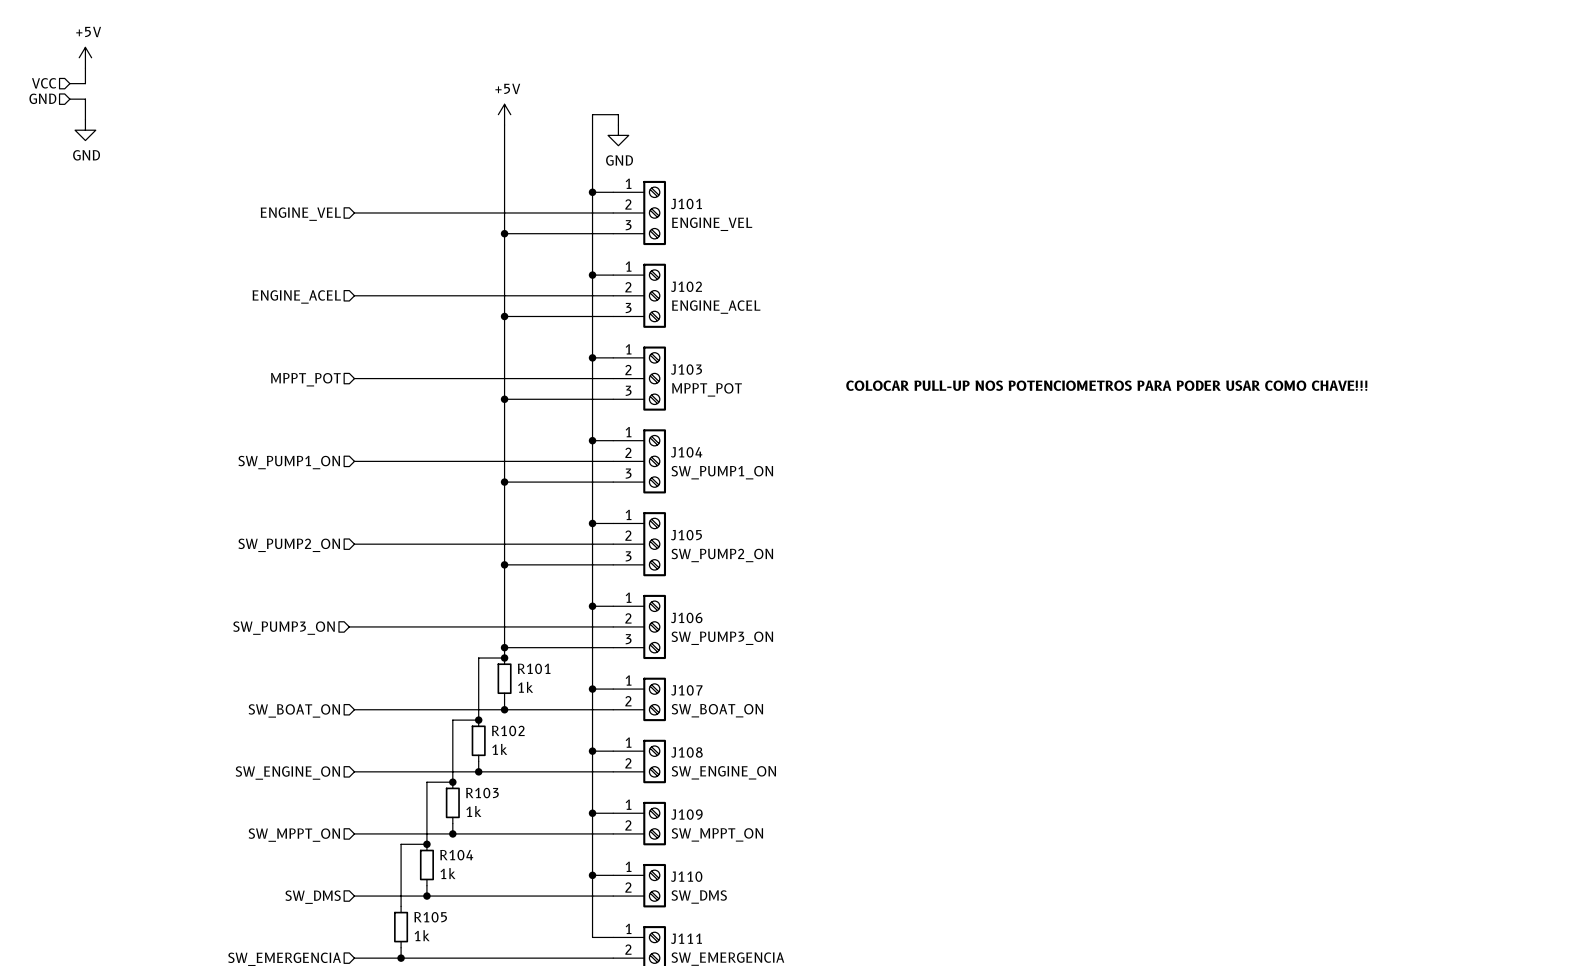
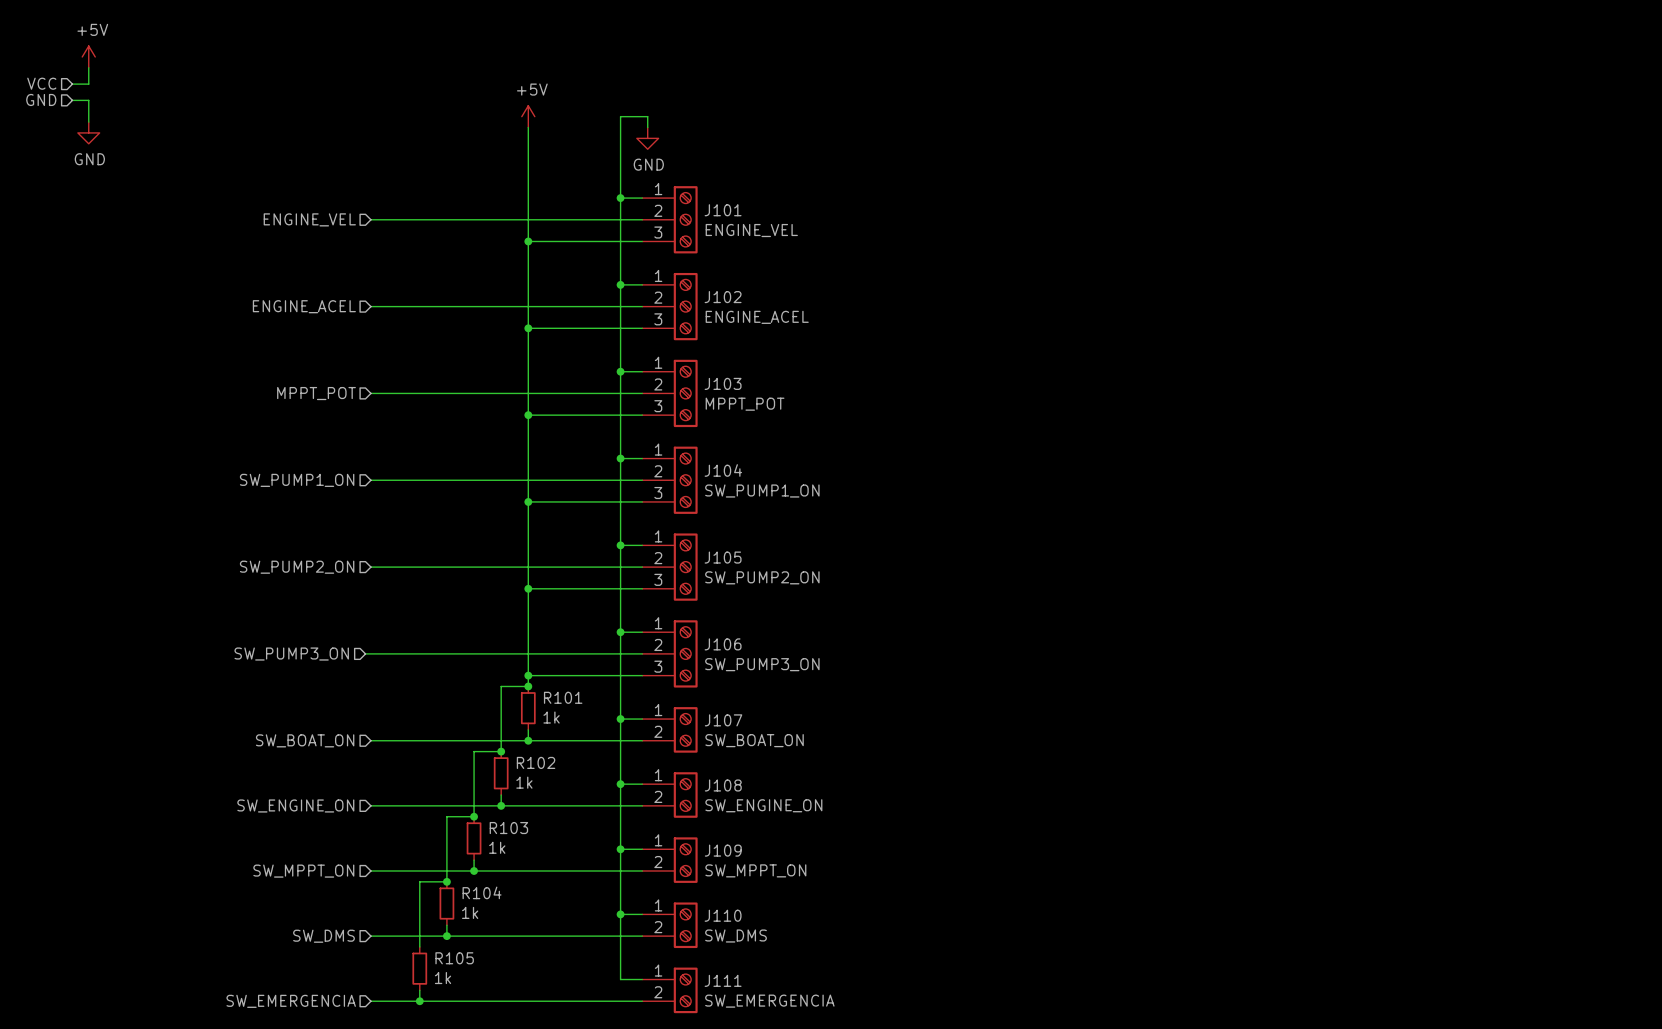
text: COLOCAR PULL-UP NOS POTENCIOMETROS PARA PODER USAR COMO CHAVE!!! (1106, 385) -> none

